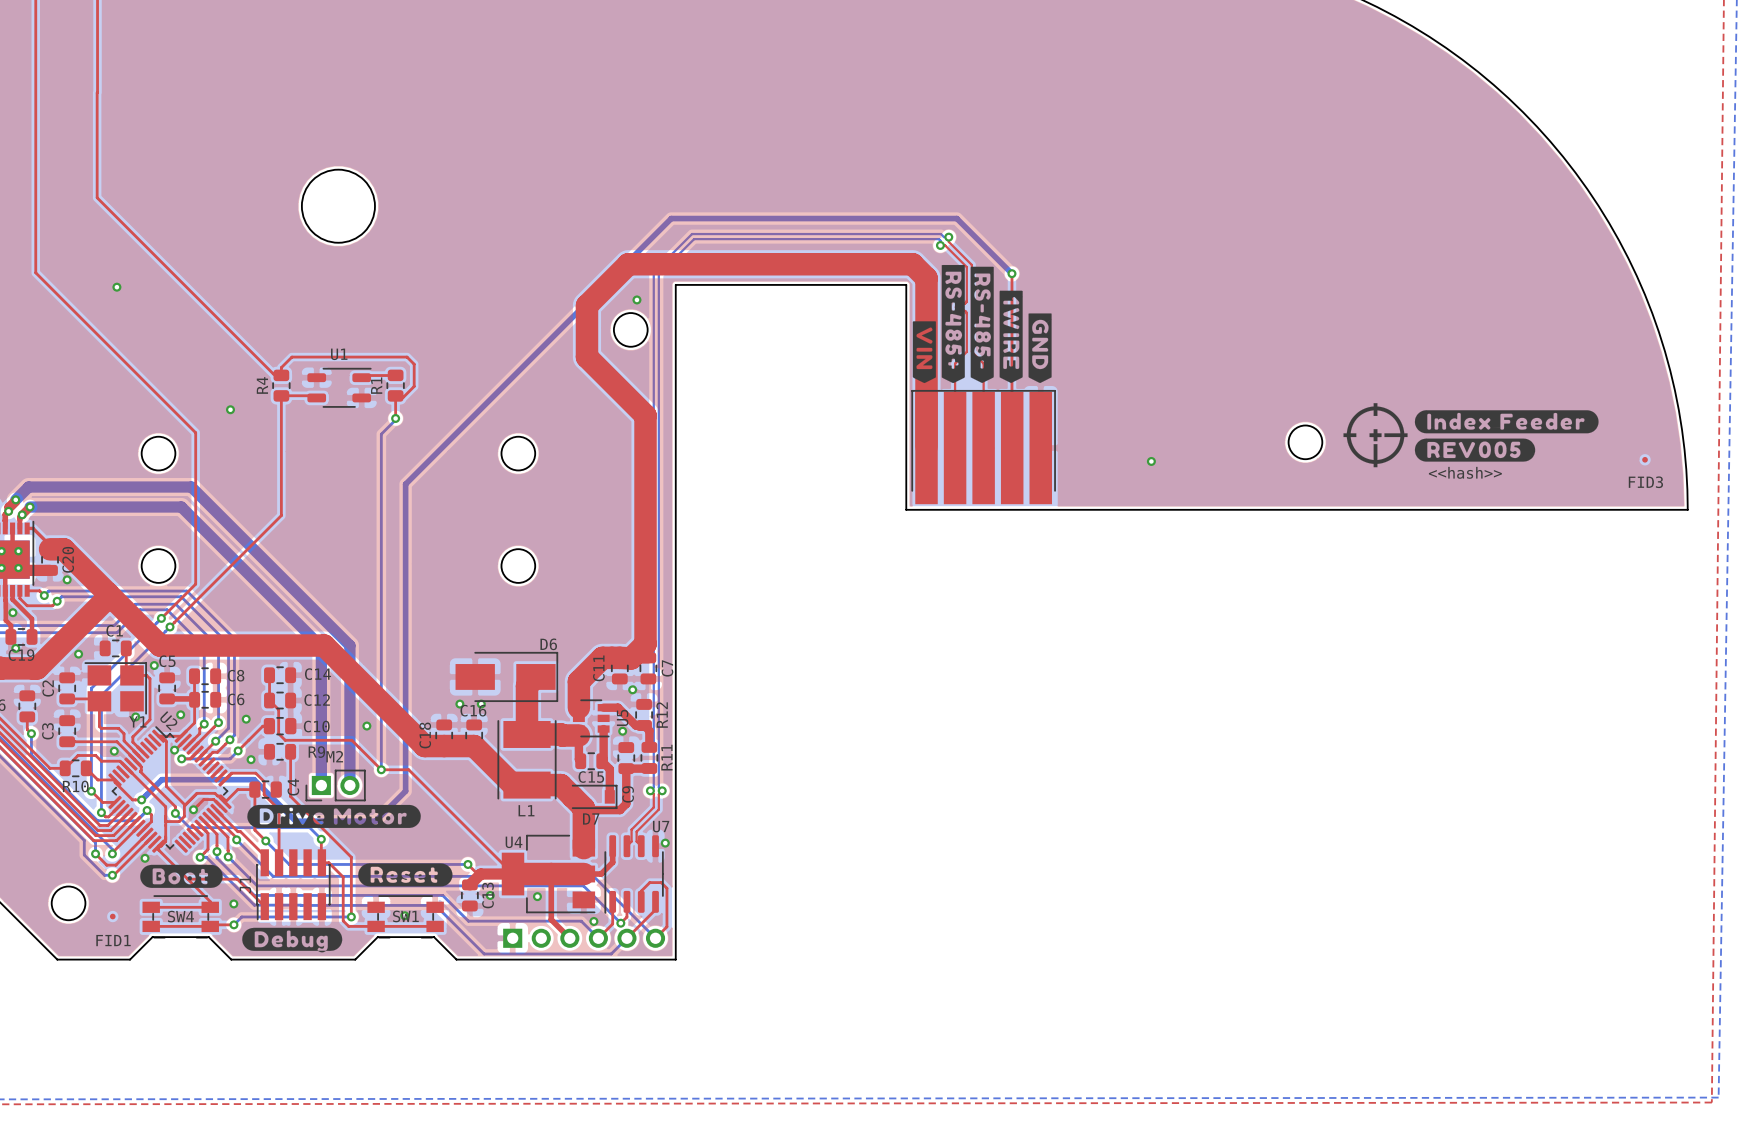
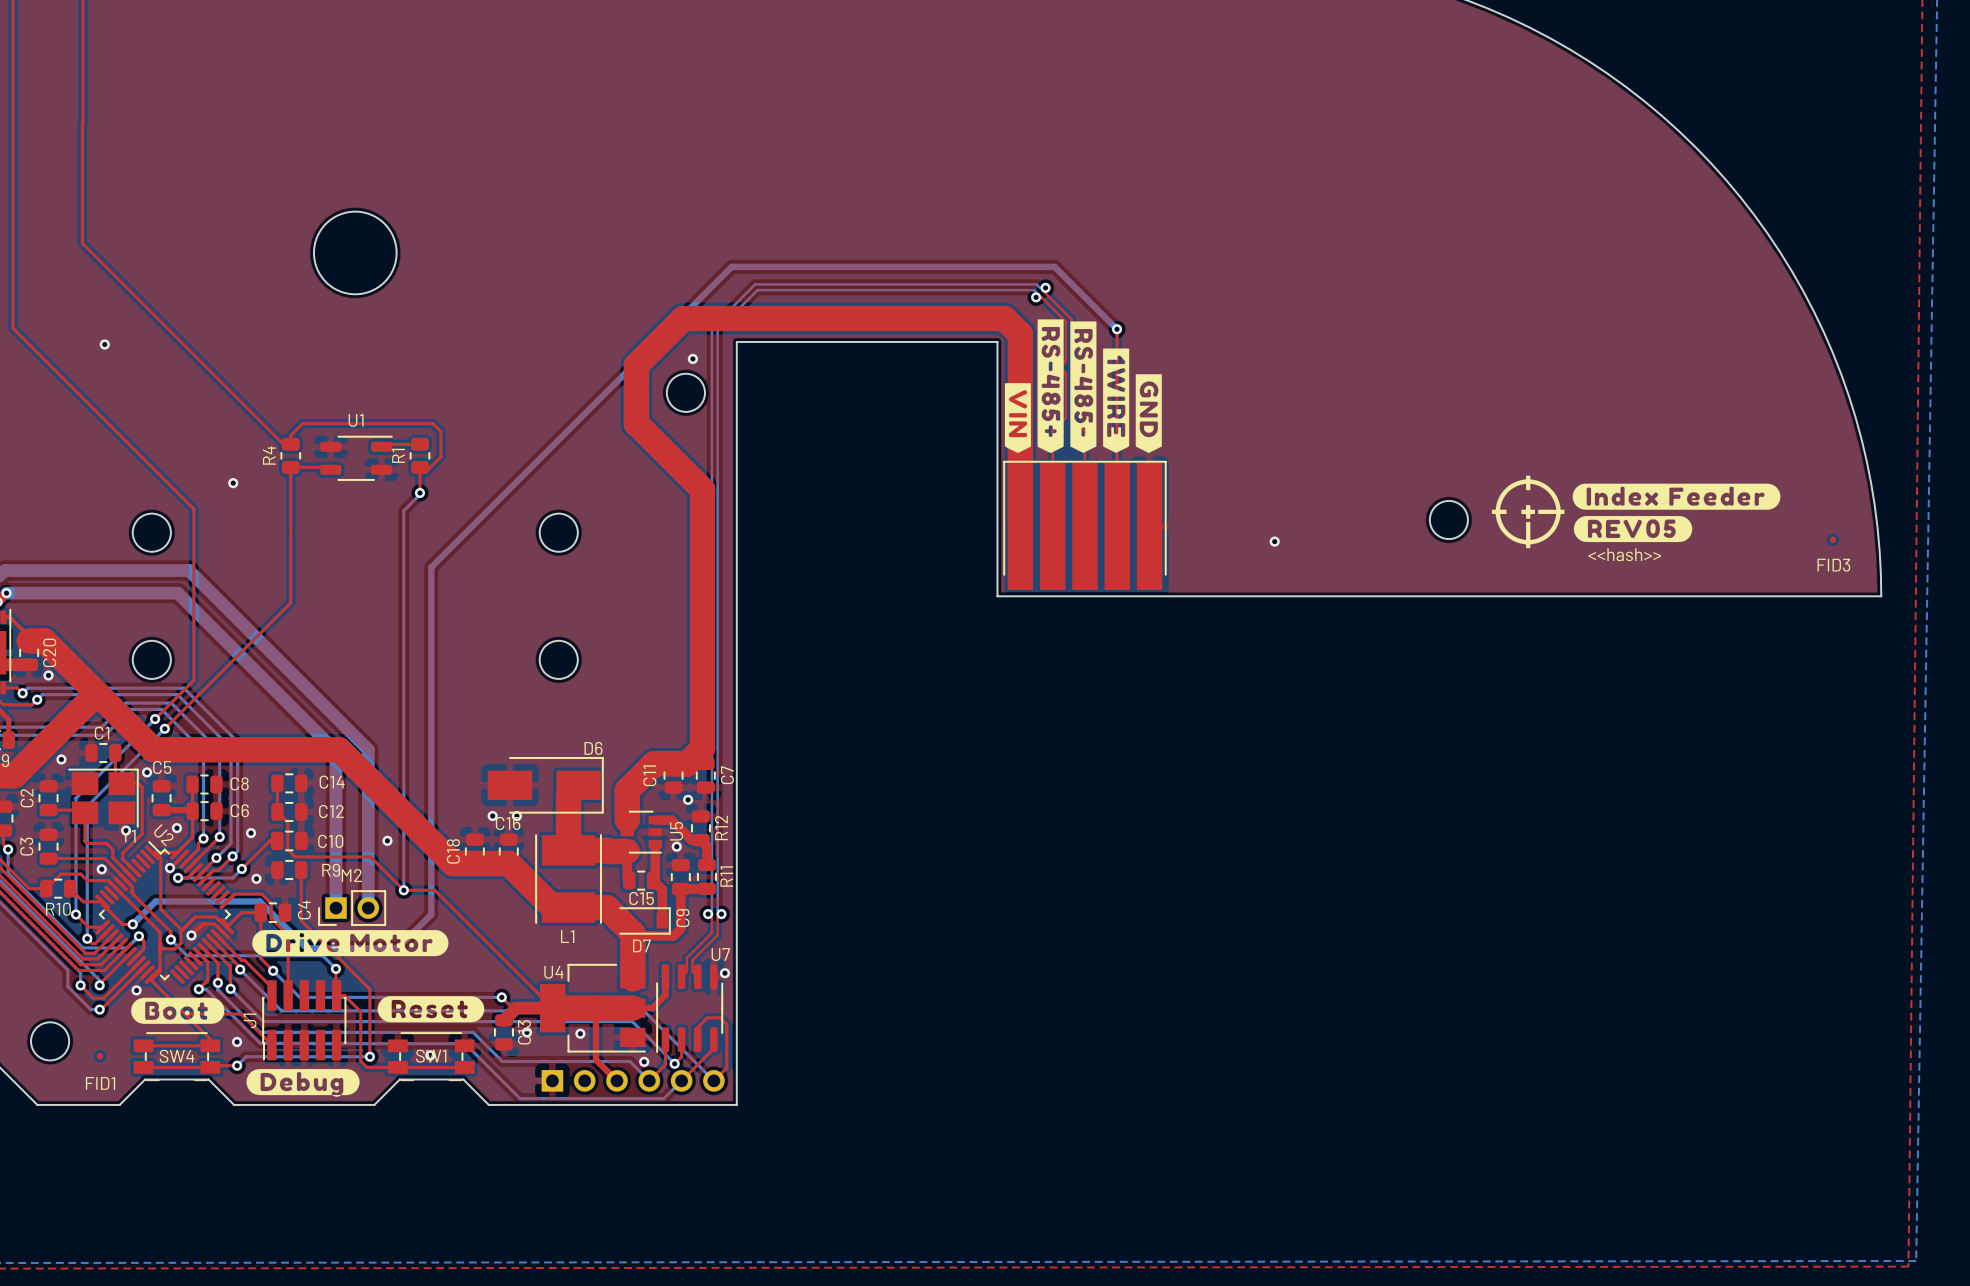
drawing shape: [1414, 438, 1536, 462] -> [1573, 515, 1693, 543]

